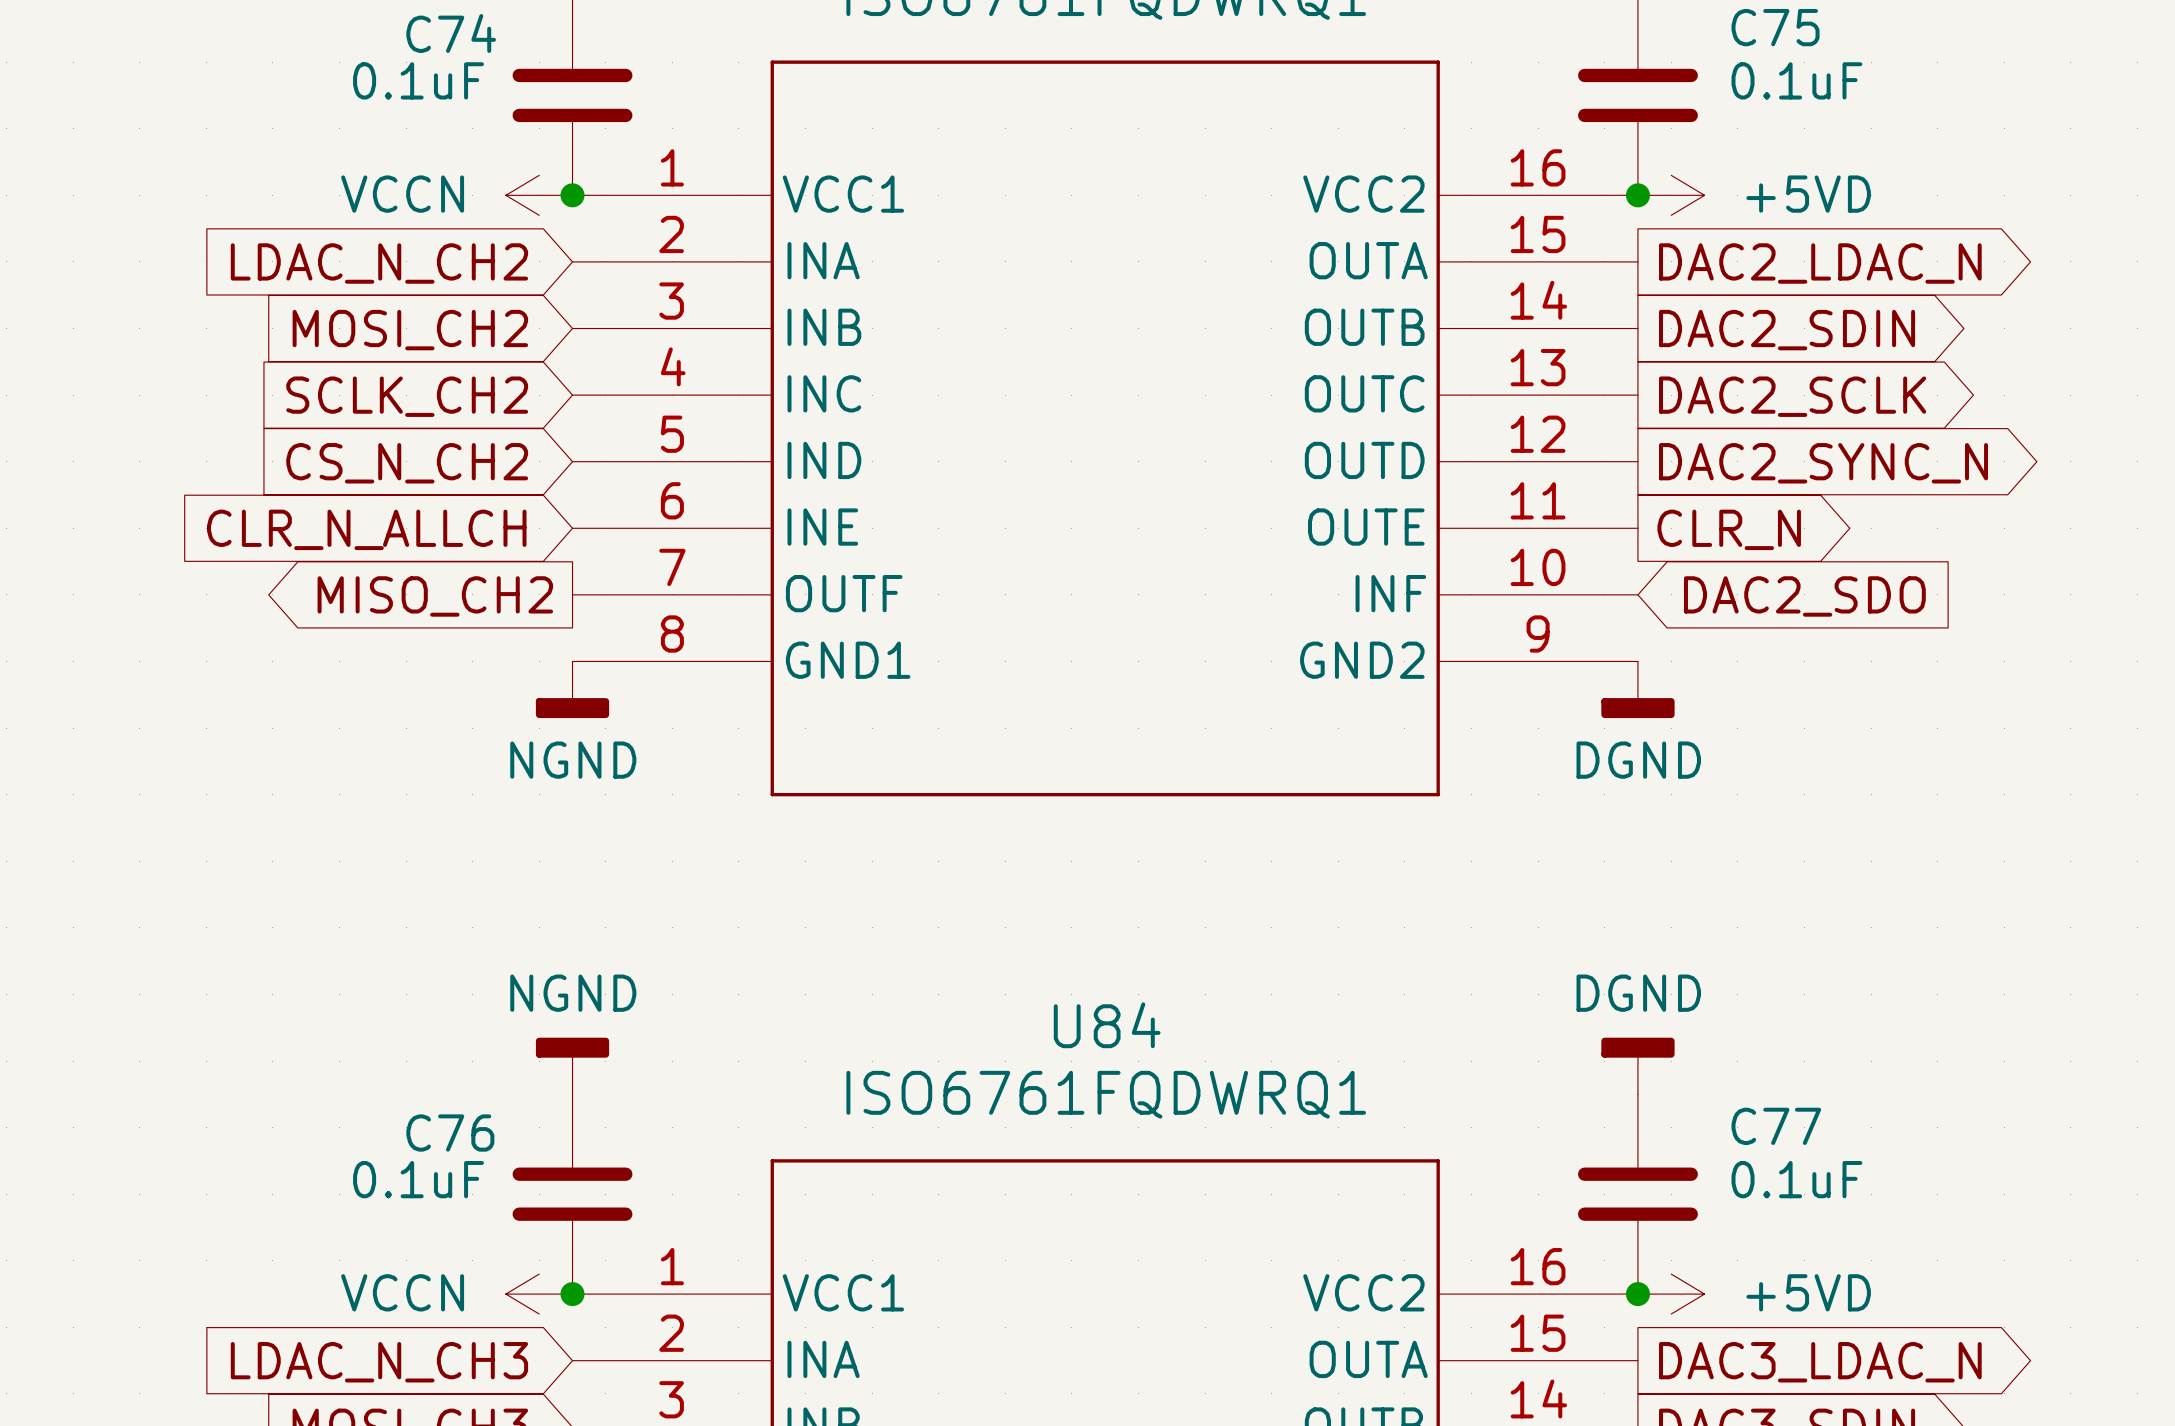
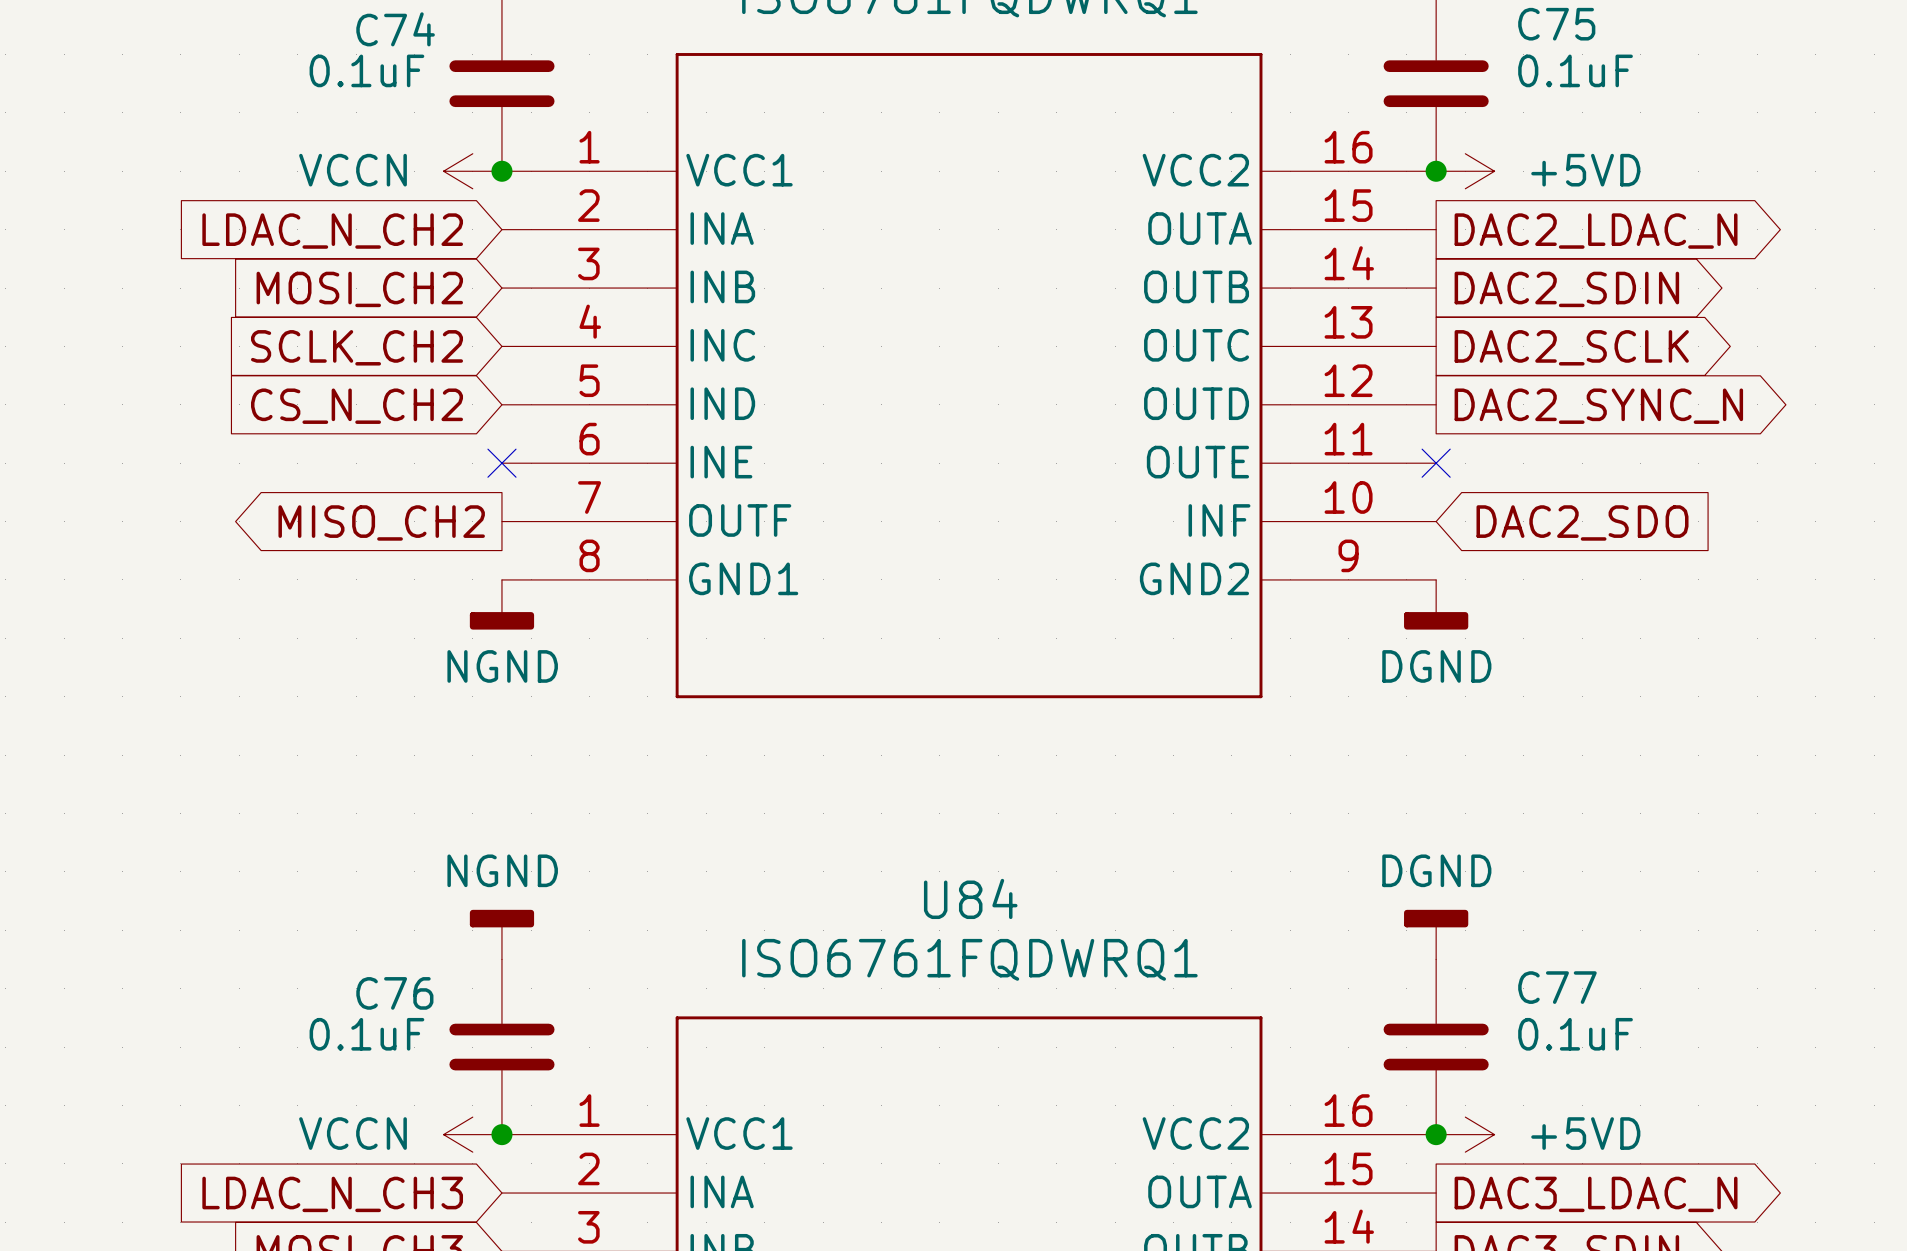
no-connect mark: none -> (501, 463)
no-connect mark: none -> (1436, 463)
global label: CLR_N_ALLCH (366, 529) -> none
global label: CLR_N (1729, 529) -> none

